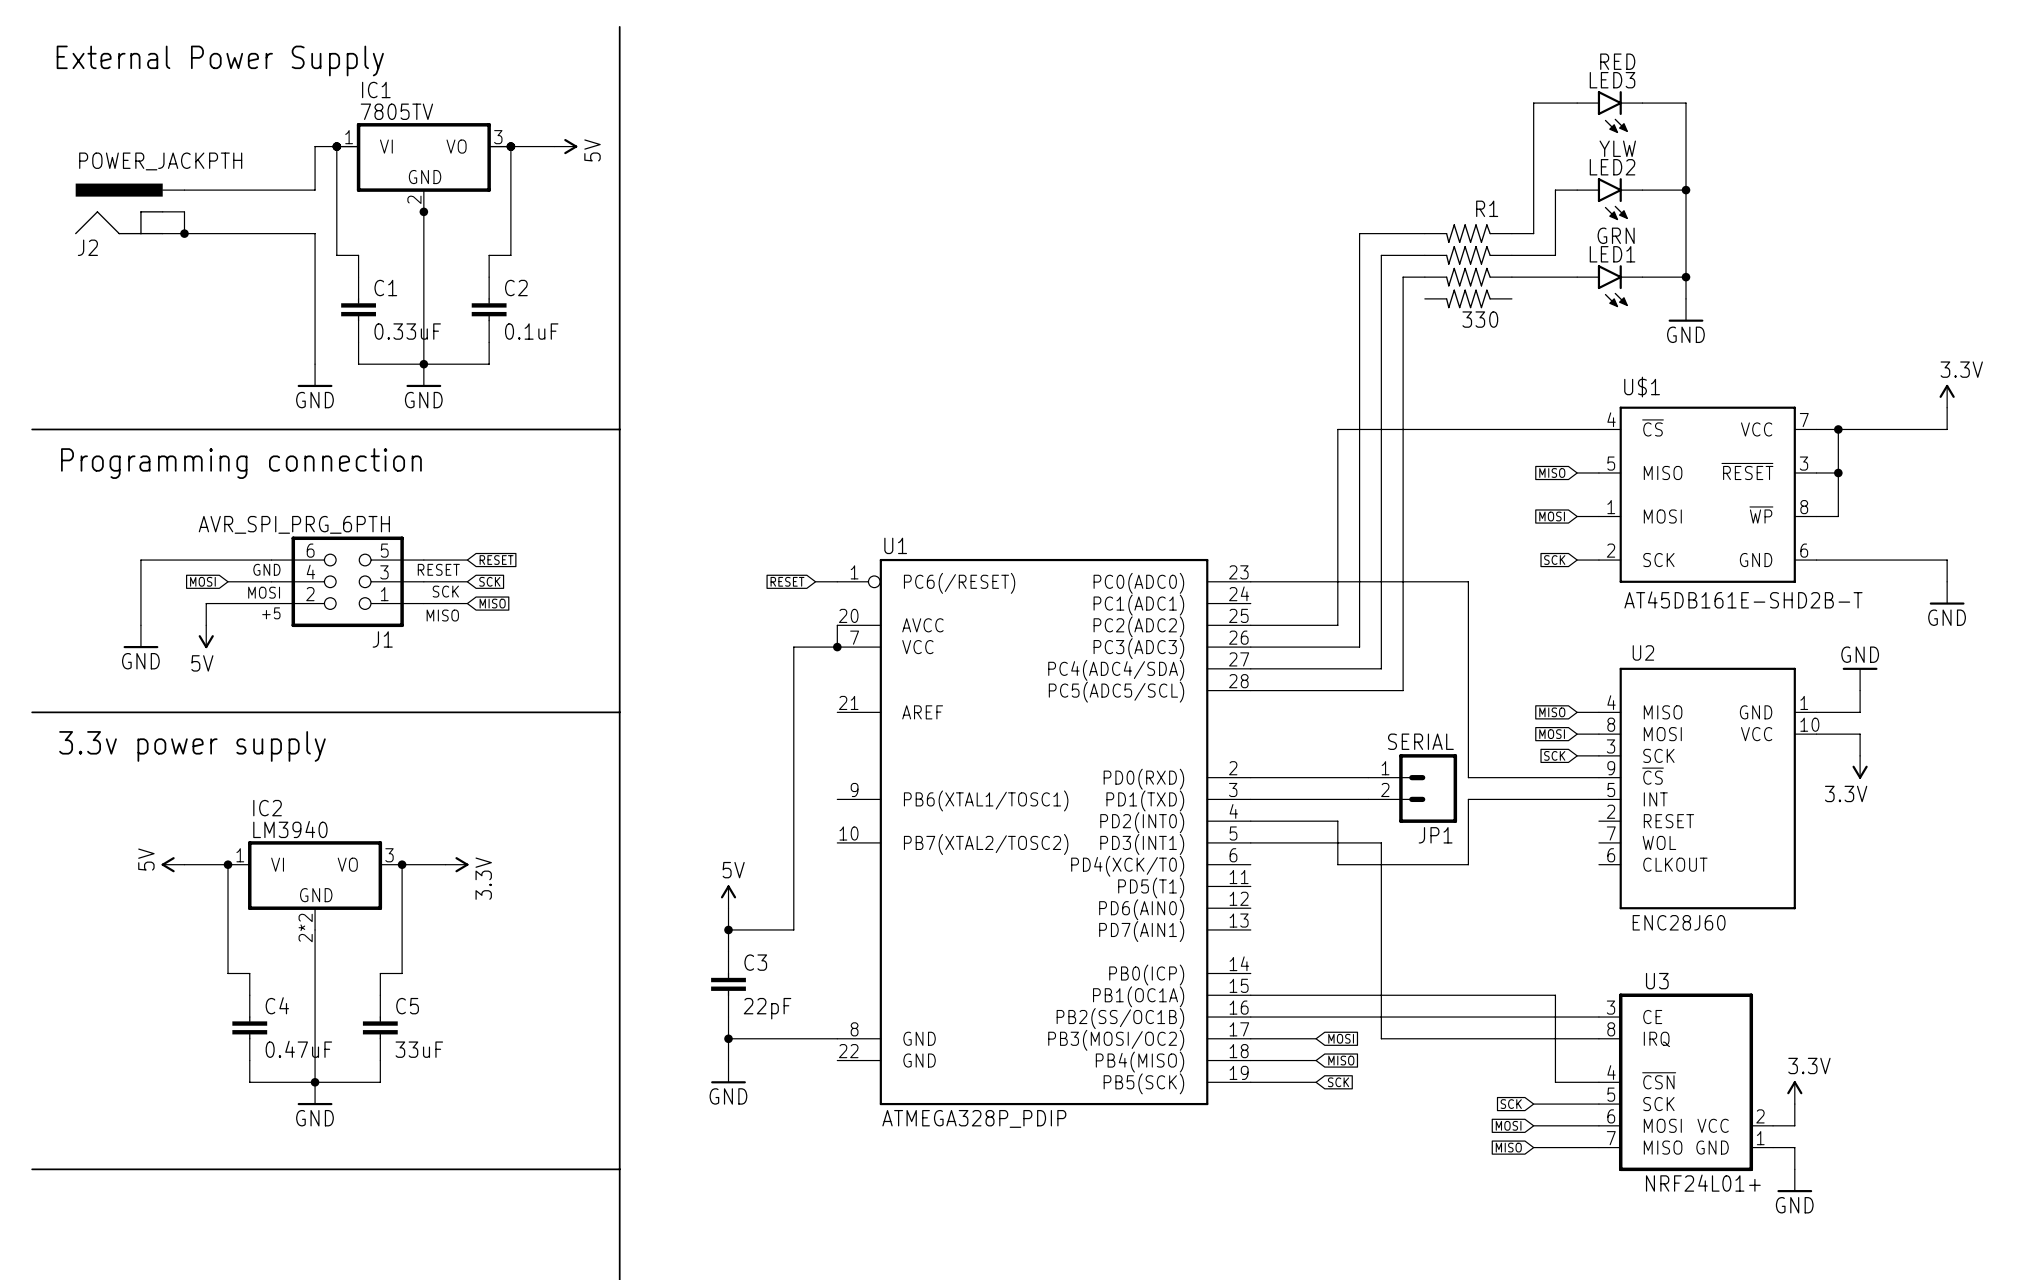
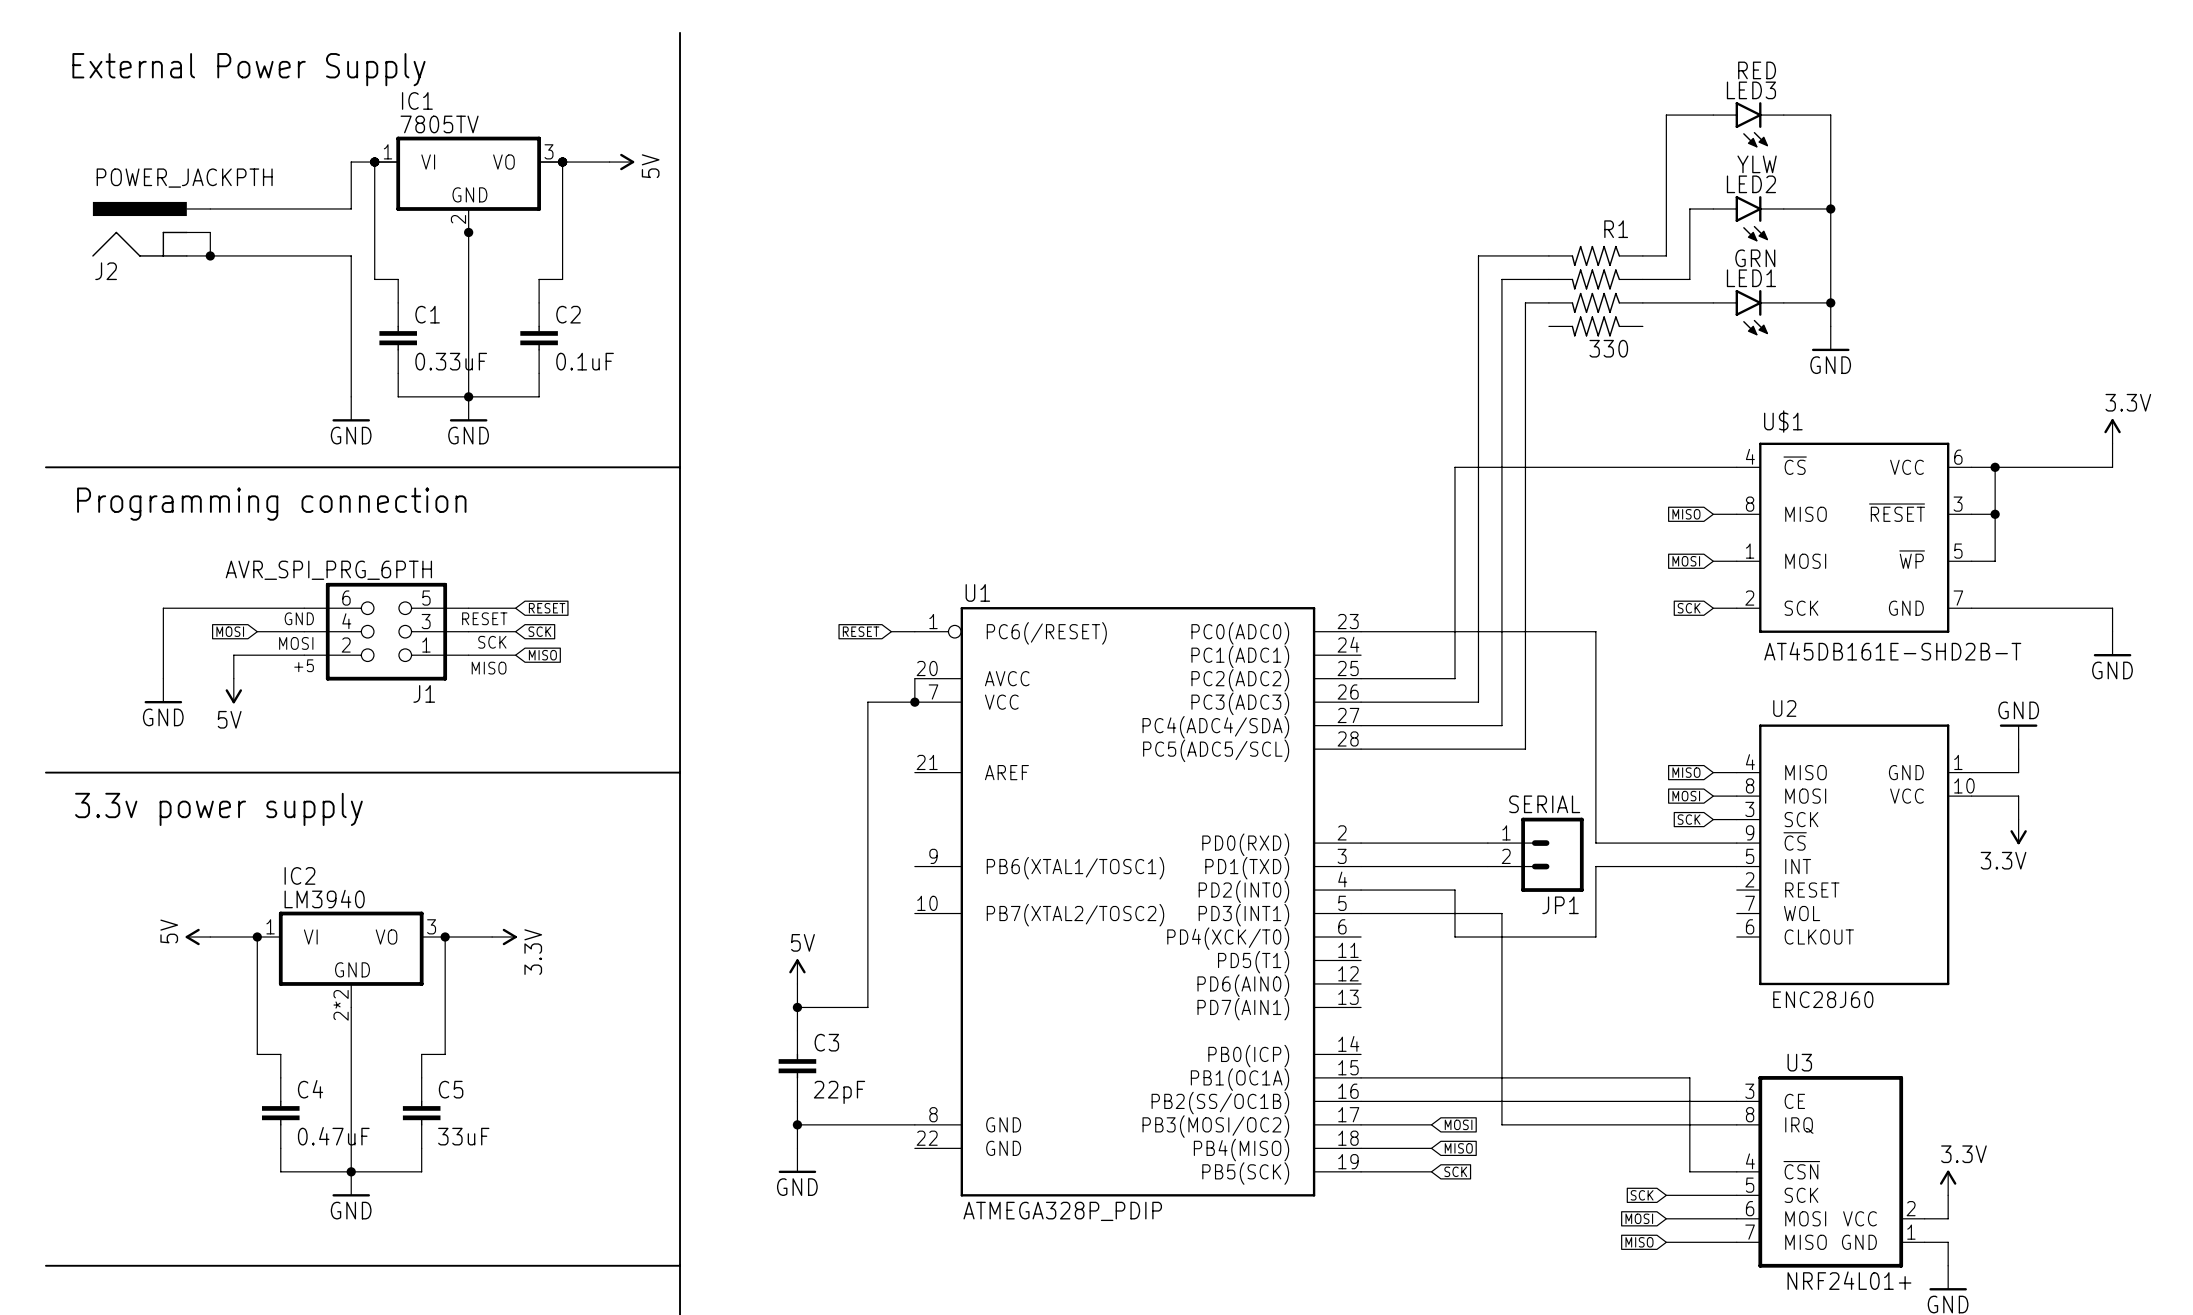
U$1 pin number: 7 (1804, 420) -> 6 (1958, 457)
U$1 pin number: 5 (1611, 463) -> 8 (1750, 504)
U$1 pin number: 8 (1804, 507) -> 5 (1958, 551)
U$1 pin number: 6 (1804, 550) -> 7 (1958, 598)

